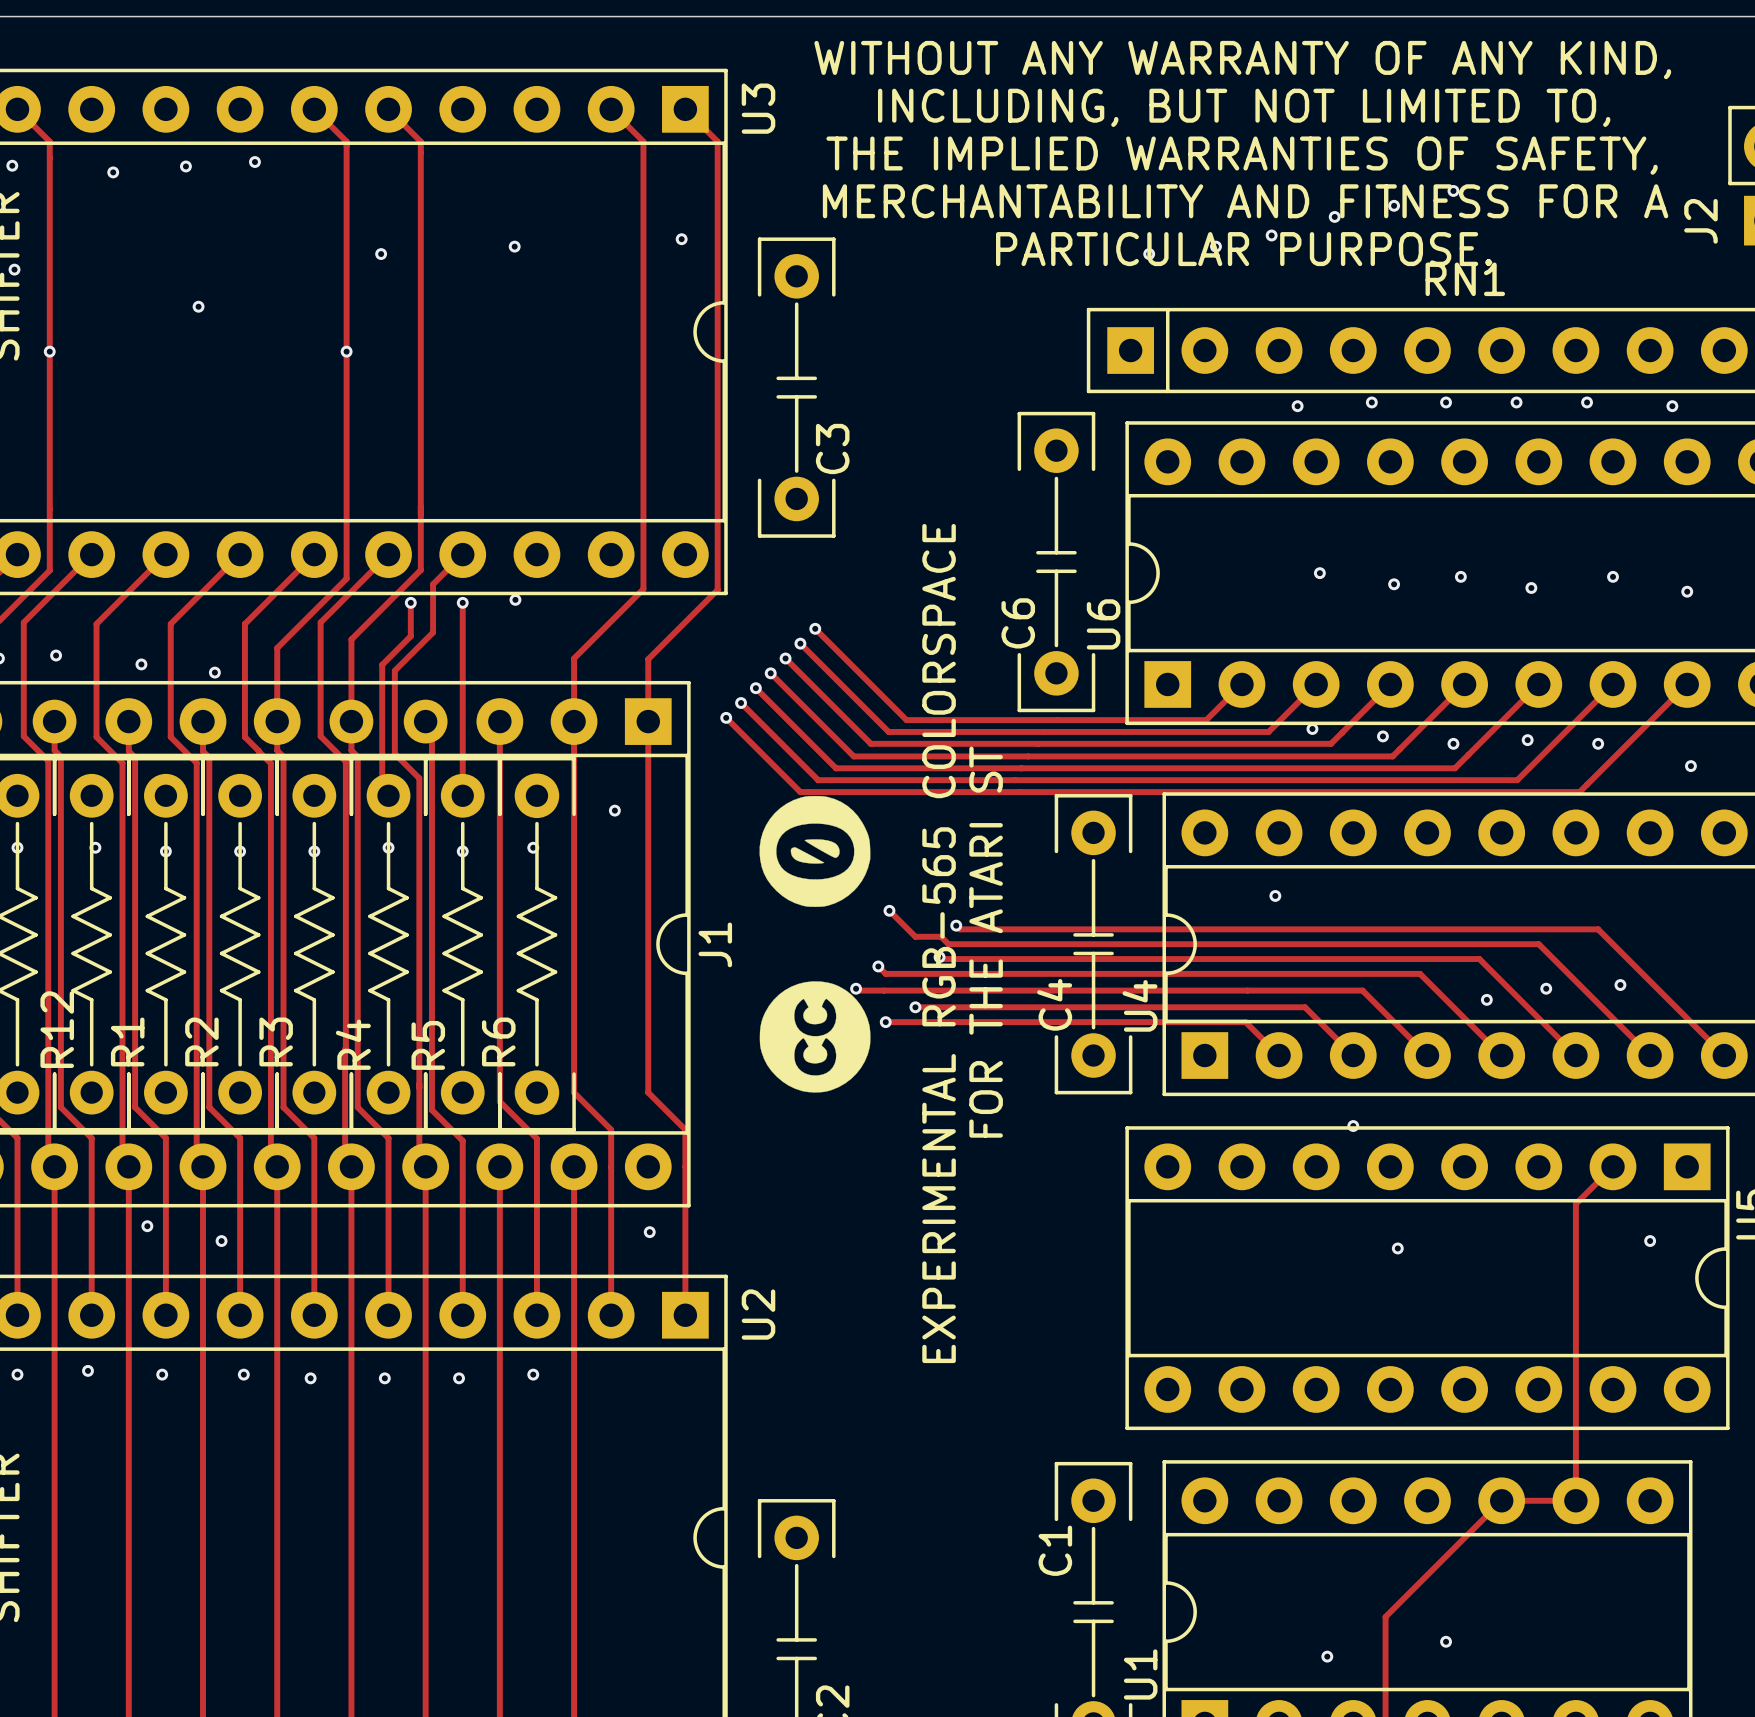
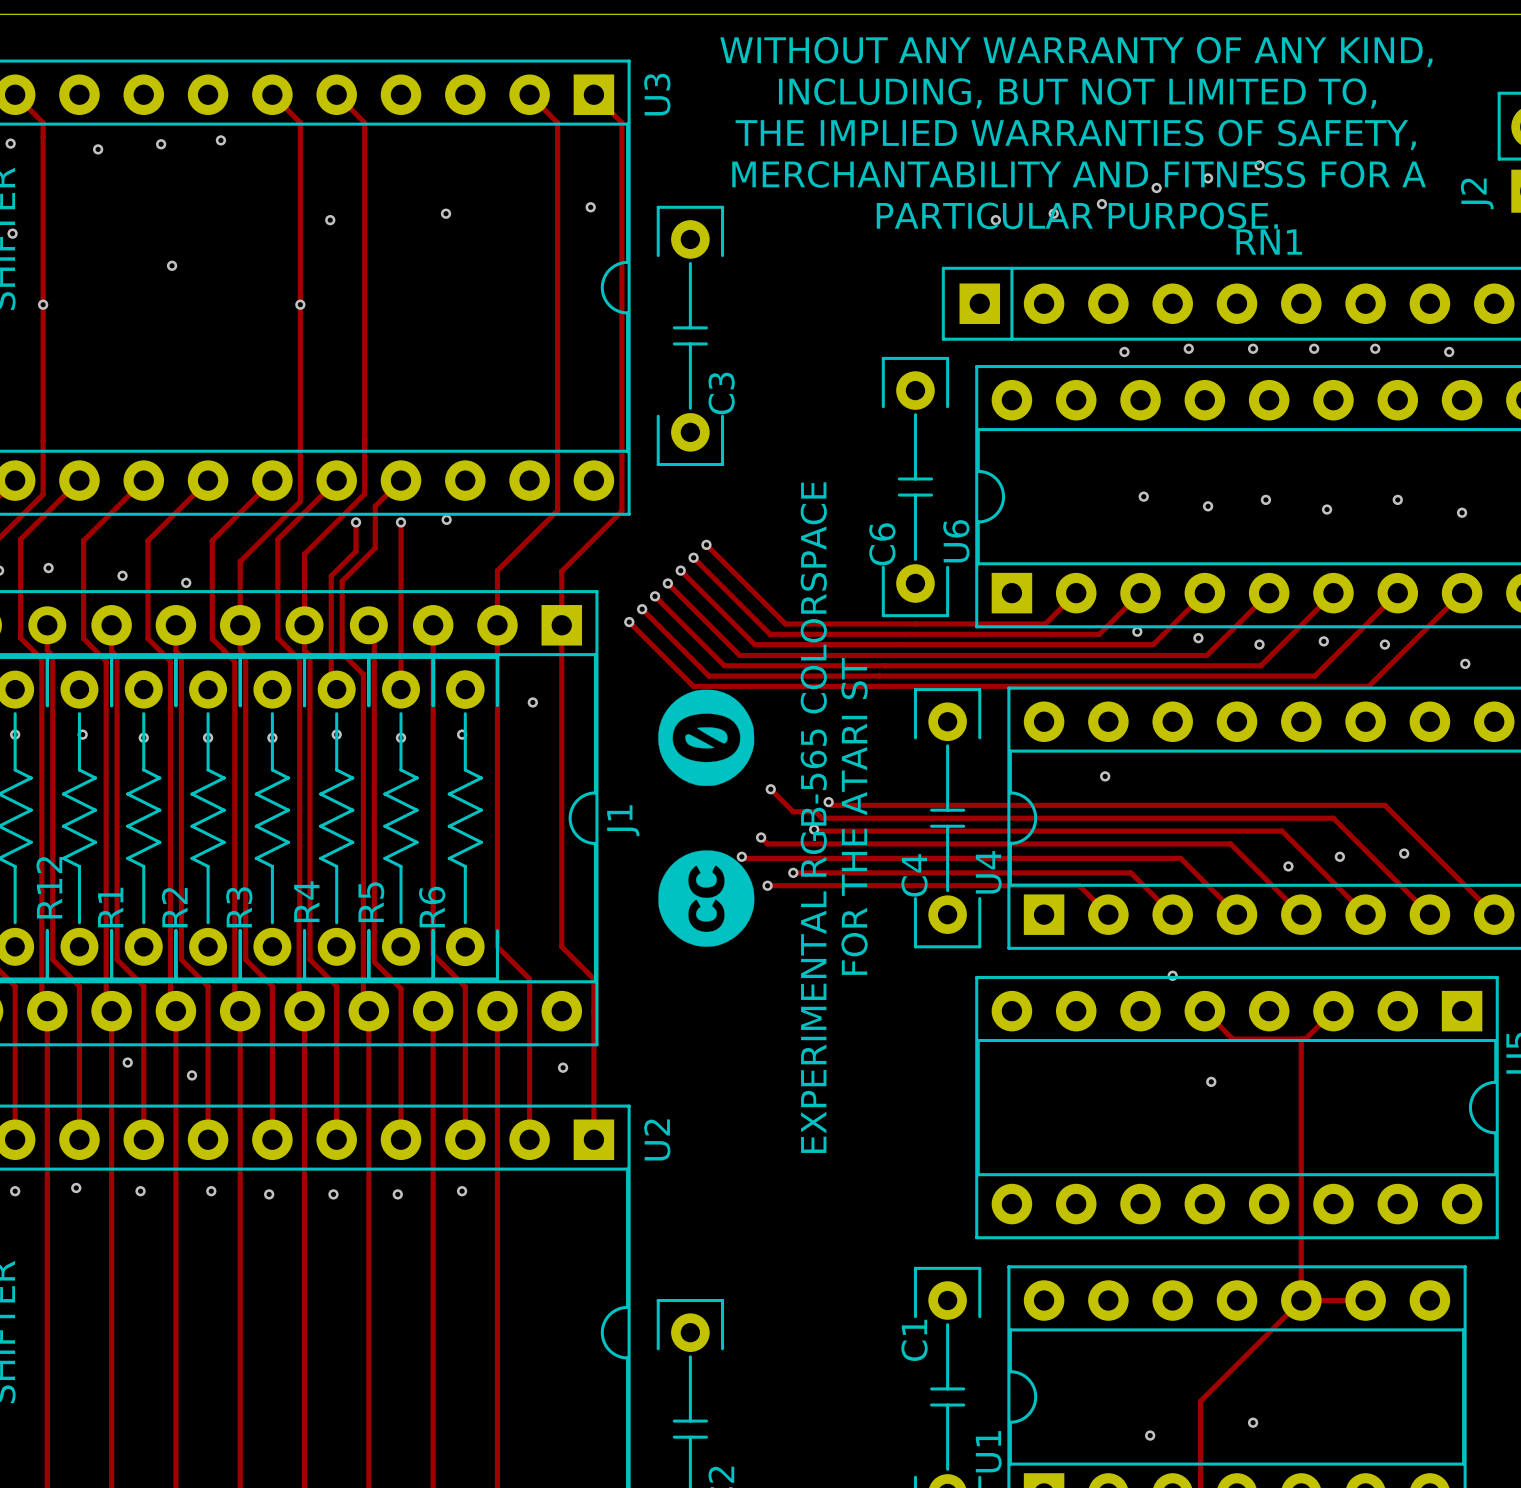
track: none -> (1204, 1011) (1232, 1039) (1305, 1039) (1333, 1011)
track: (1613, 1166) (1575, 1203) (1575, 1500) -> none
track: none -> (1301, 1039) (1301, 1300)
via: (1650, 1241) -> none

